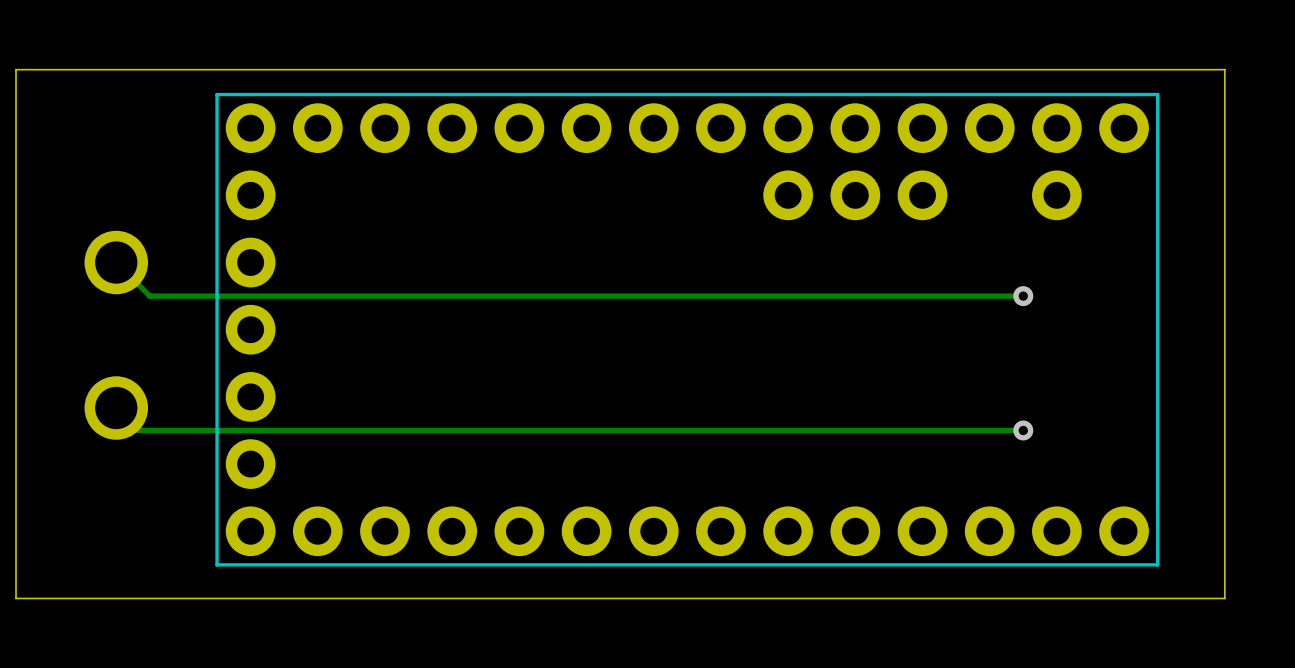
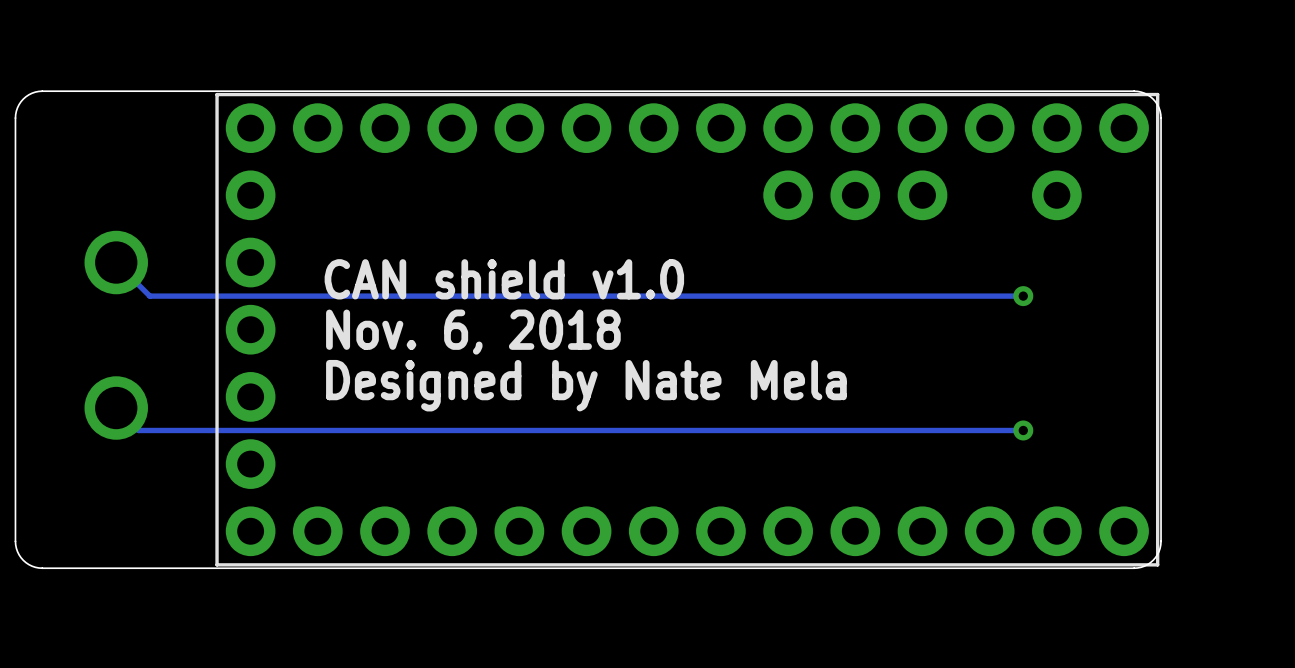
board edge: (1224, 69) (16, 69) (16, 598) (1224, 598) (1224, 69) -> (1134, 91) (1144, 93) (1153, 99) (1158, 107) (1161, 118) (1161, 541) (1157, 554) (1144, 566) (1134, 568) (42, 568) (28, 564) (17, 551) (15, 541) (15, 118) (19, 104) (32, 93) (42, 91) (1134, 91)
text: none -> CAN shield v1.0 (504, 279)
text: none -> Nov. 6, 2018 (473, 332)
text: none -> Designed by Nate Mela (586, 385)

